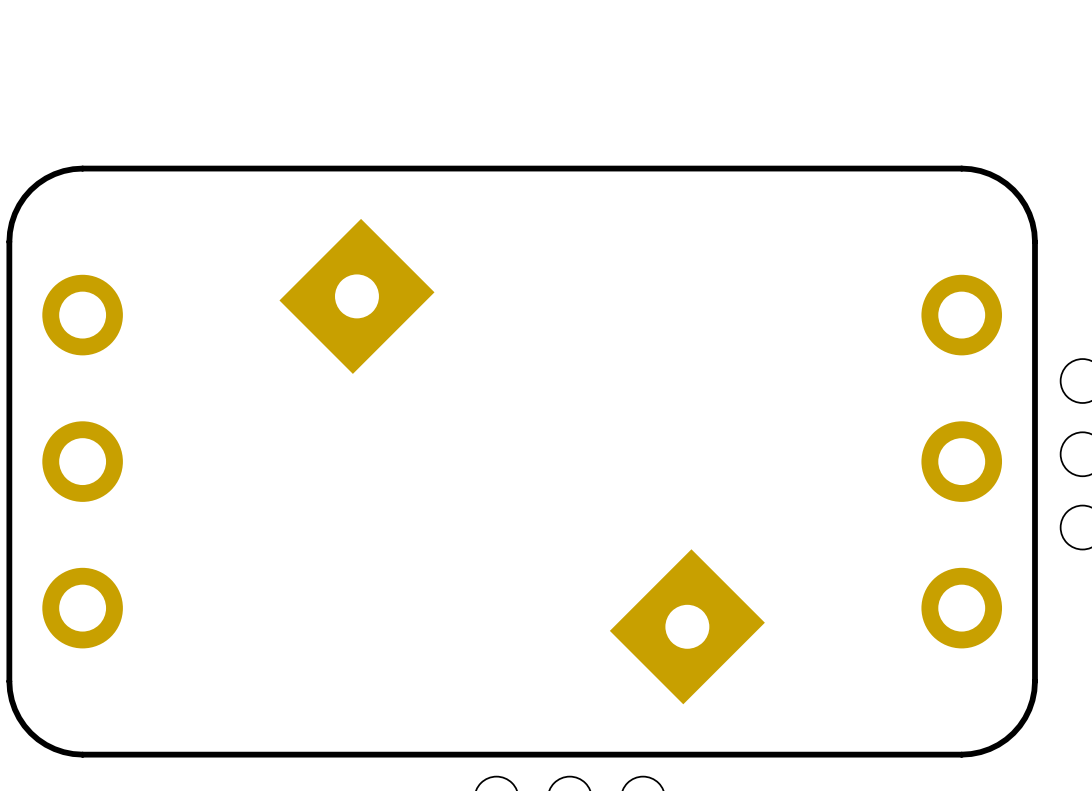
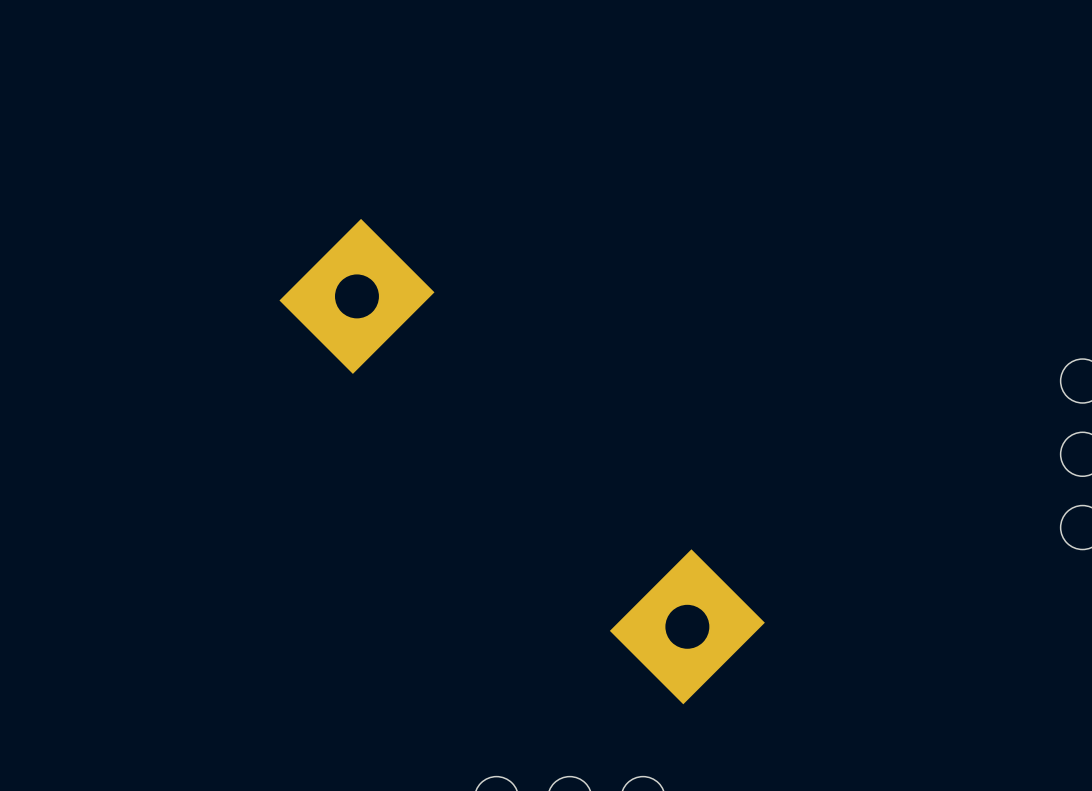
board edge: (961, 168) (82, 168) (63, 171) (45, 178) (30, 190) (19, 205) (11, 222) (9, 241) (9, 681) (11, 700) (19, 718) (30, 733) (45, 744) (63, 752) (82, 754) (961, 754) (980, 752) (998, 744) (1013, 733) (1025, 718) (1034, 690) (1034, 241) (1029, 213) (1013, 190) (989, 174) (961, 168) -> none
part: (82, 461) -> none
part: (961, 461) -> none

